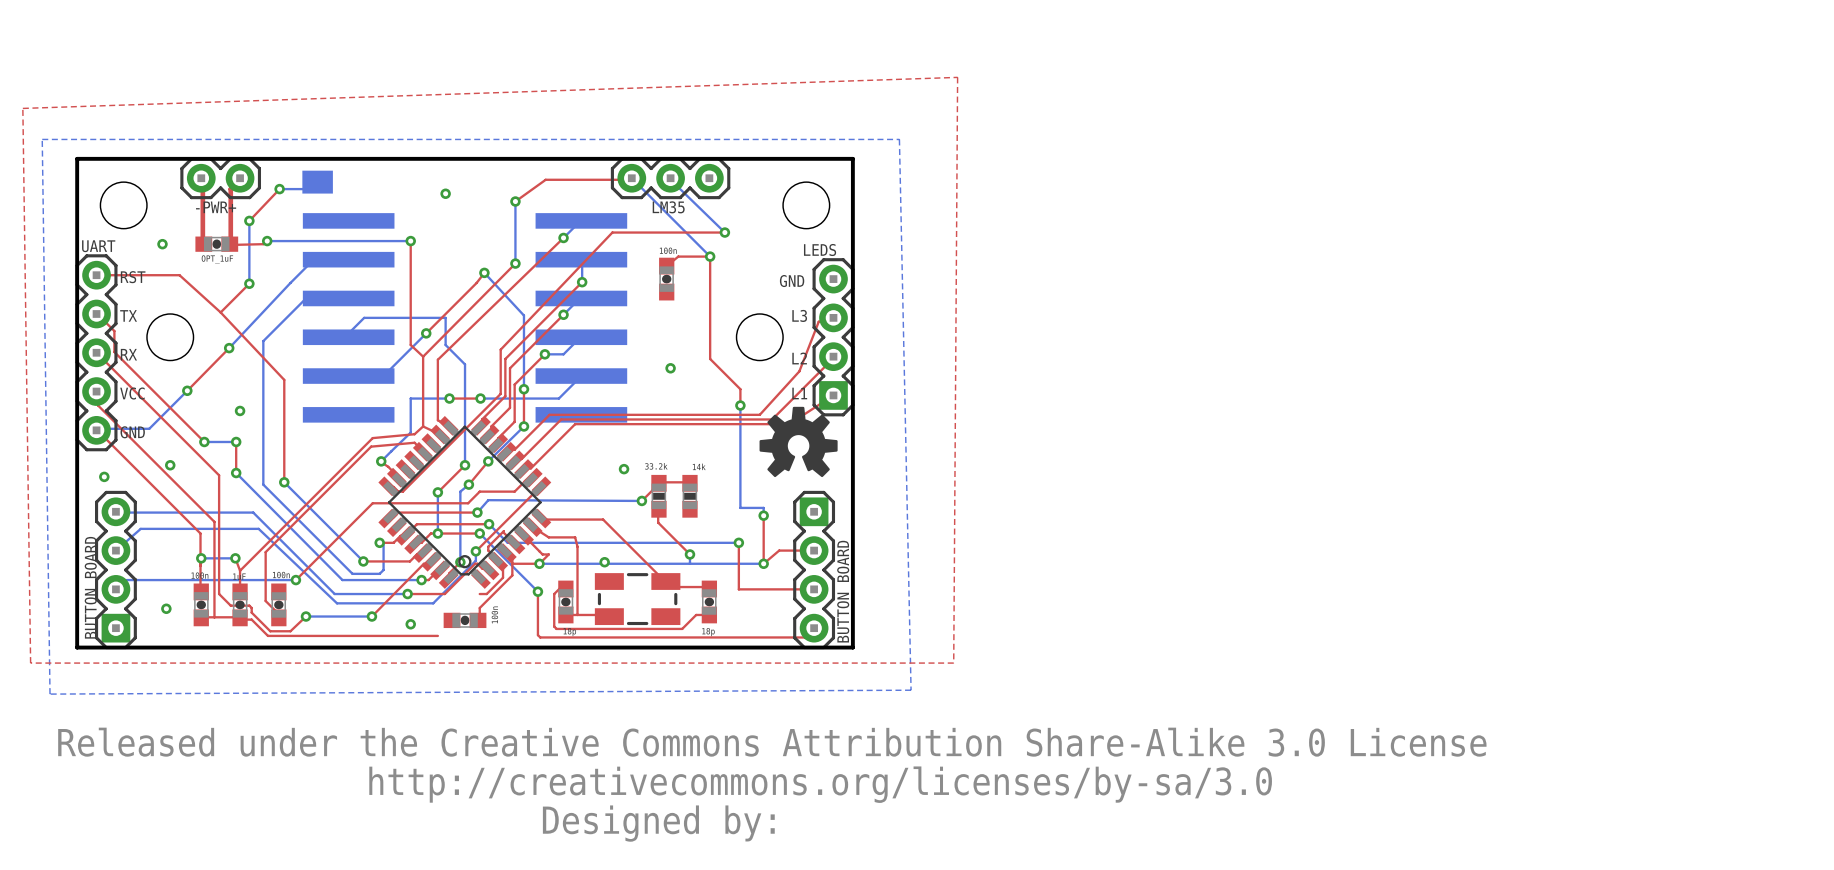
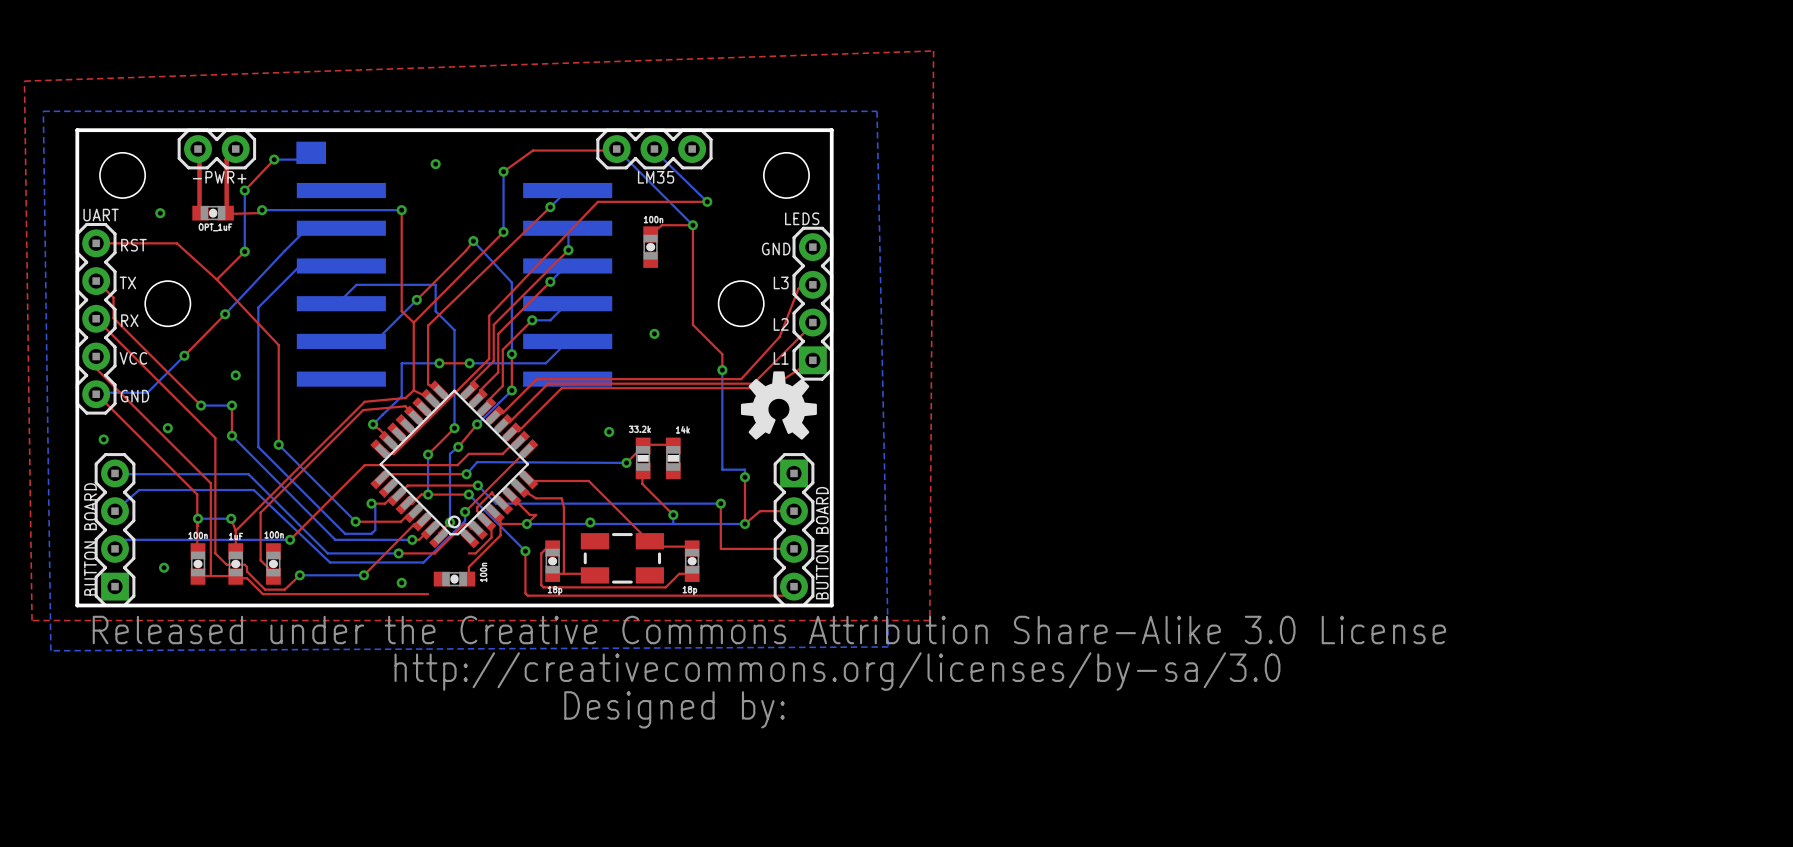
drawing position: (772, 784) -> (769, 672)

